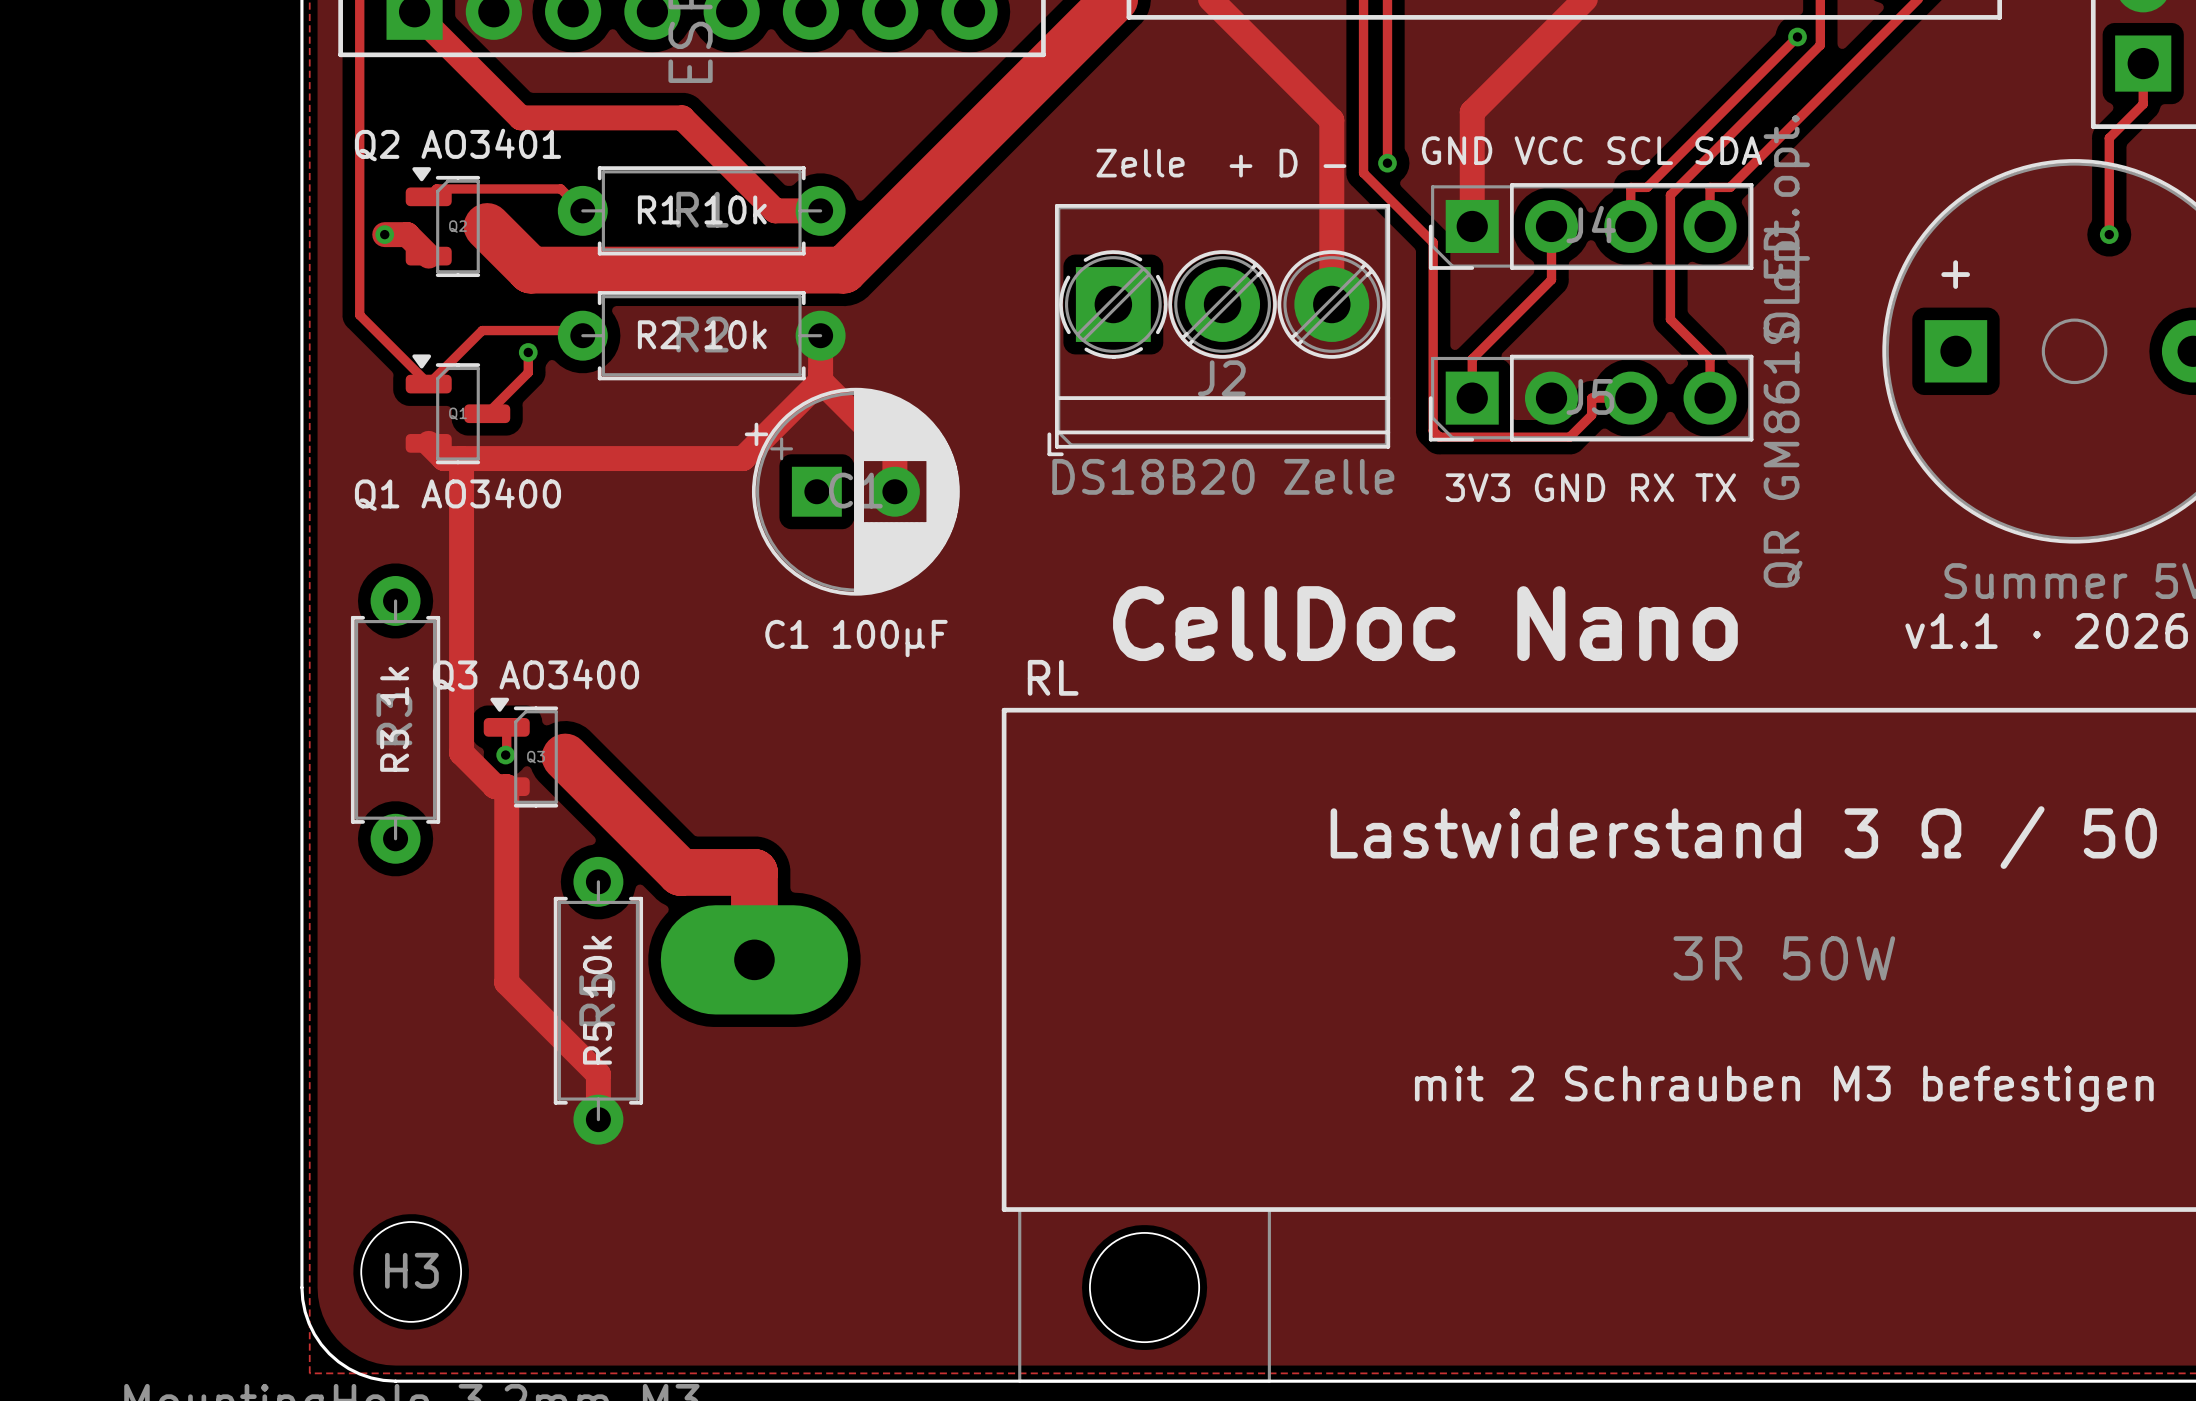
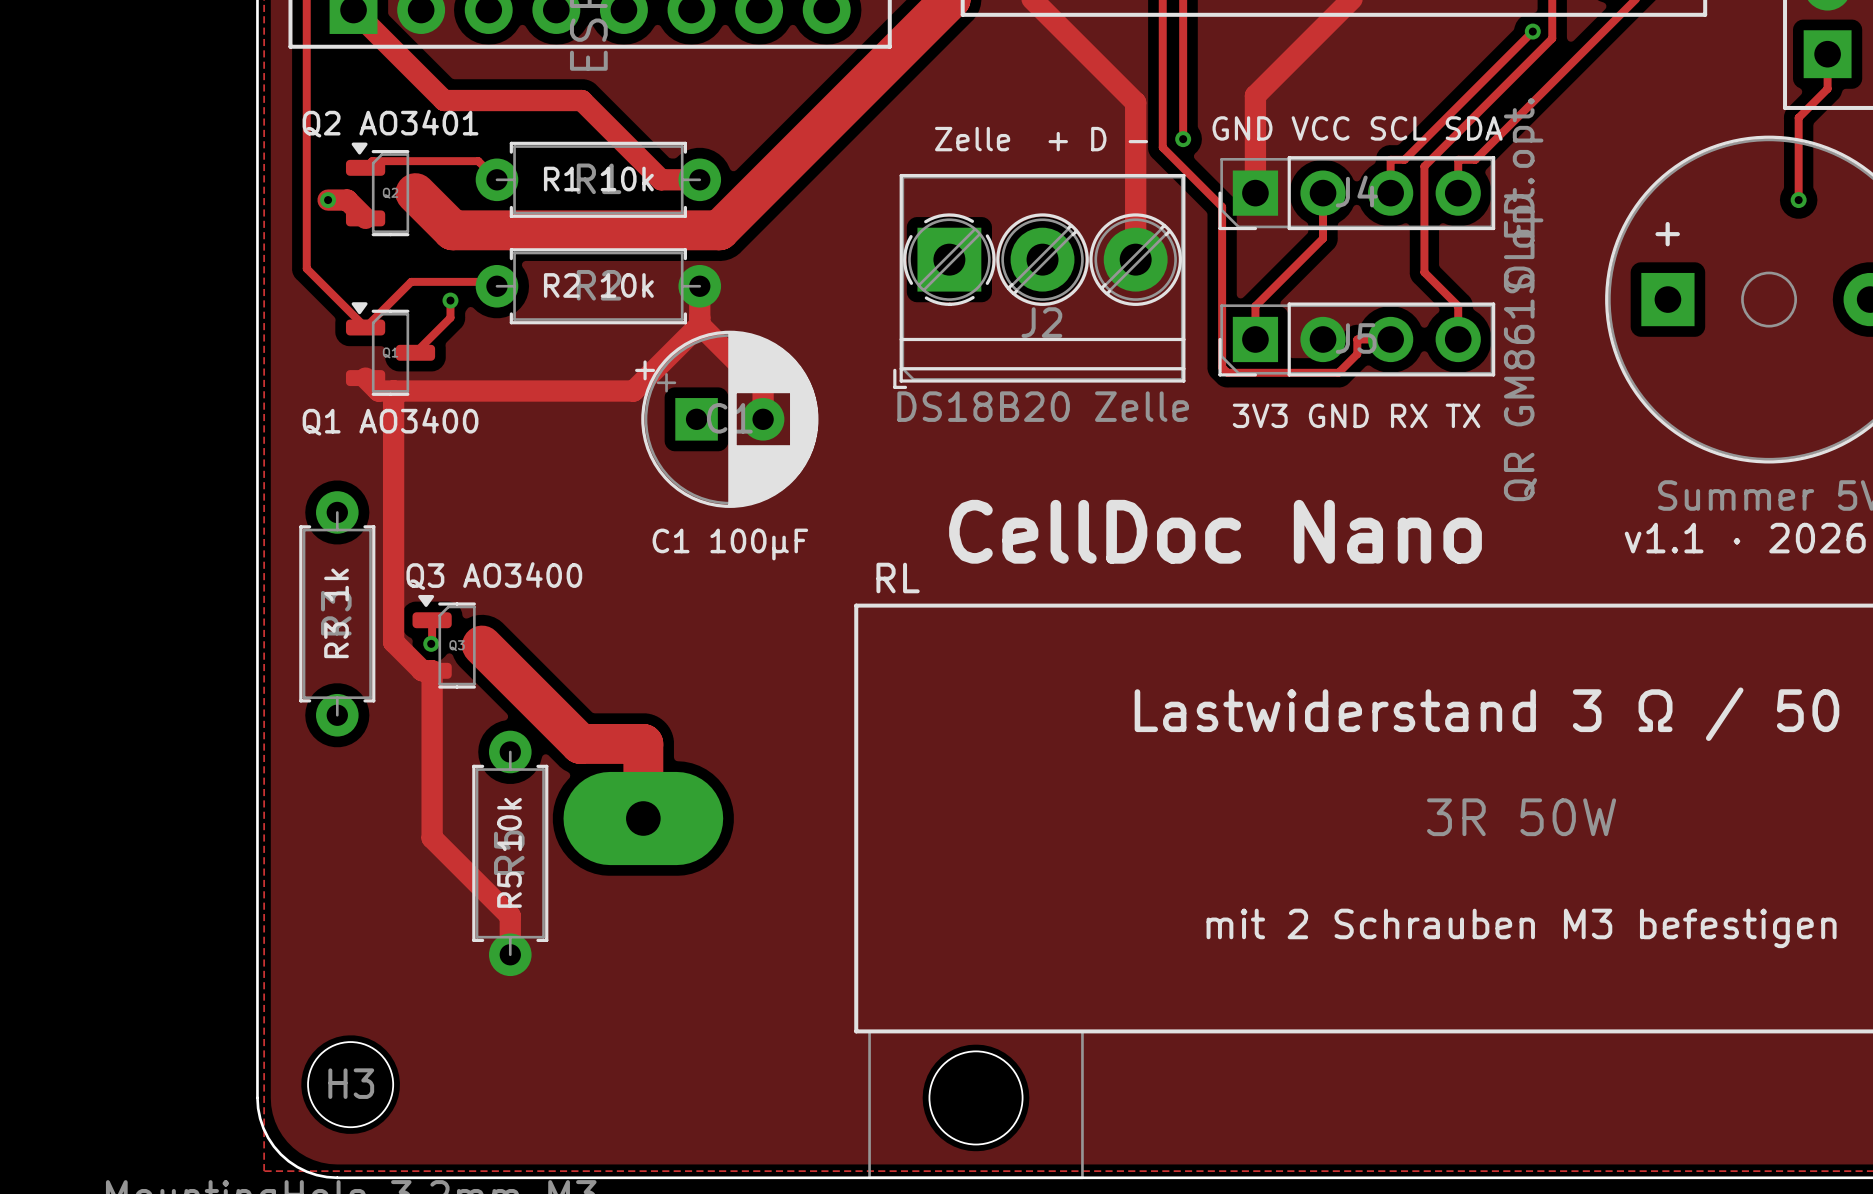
Q3 text position: Q3 AO3400 (535, 675) -> Q3 AO3400 (494, 576)

